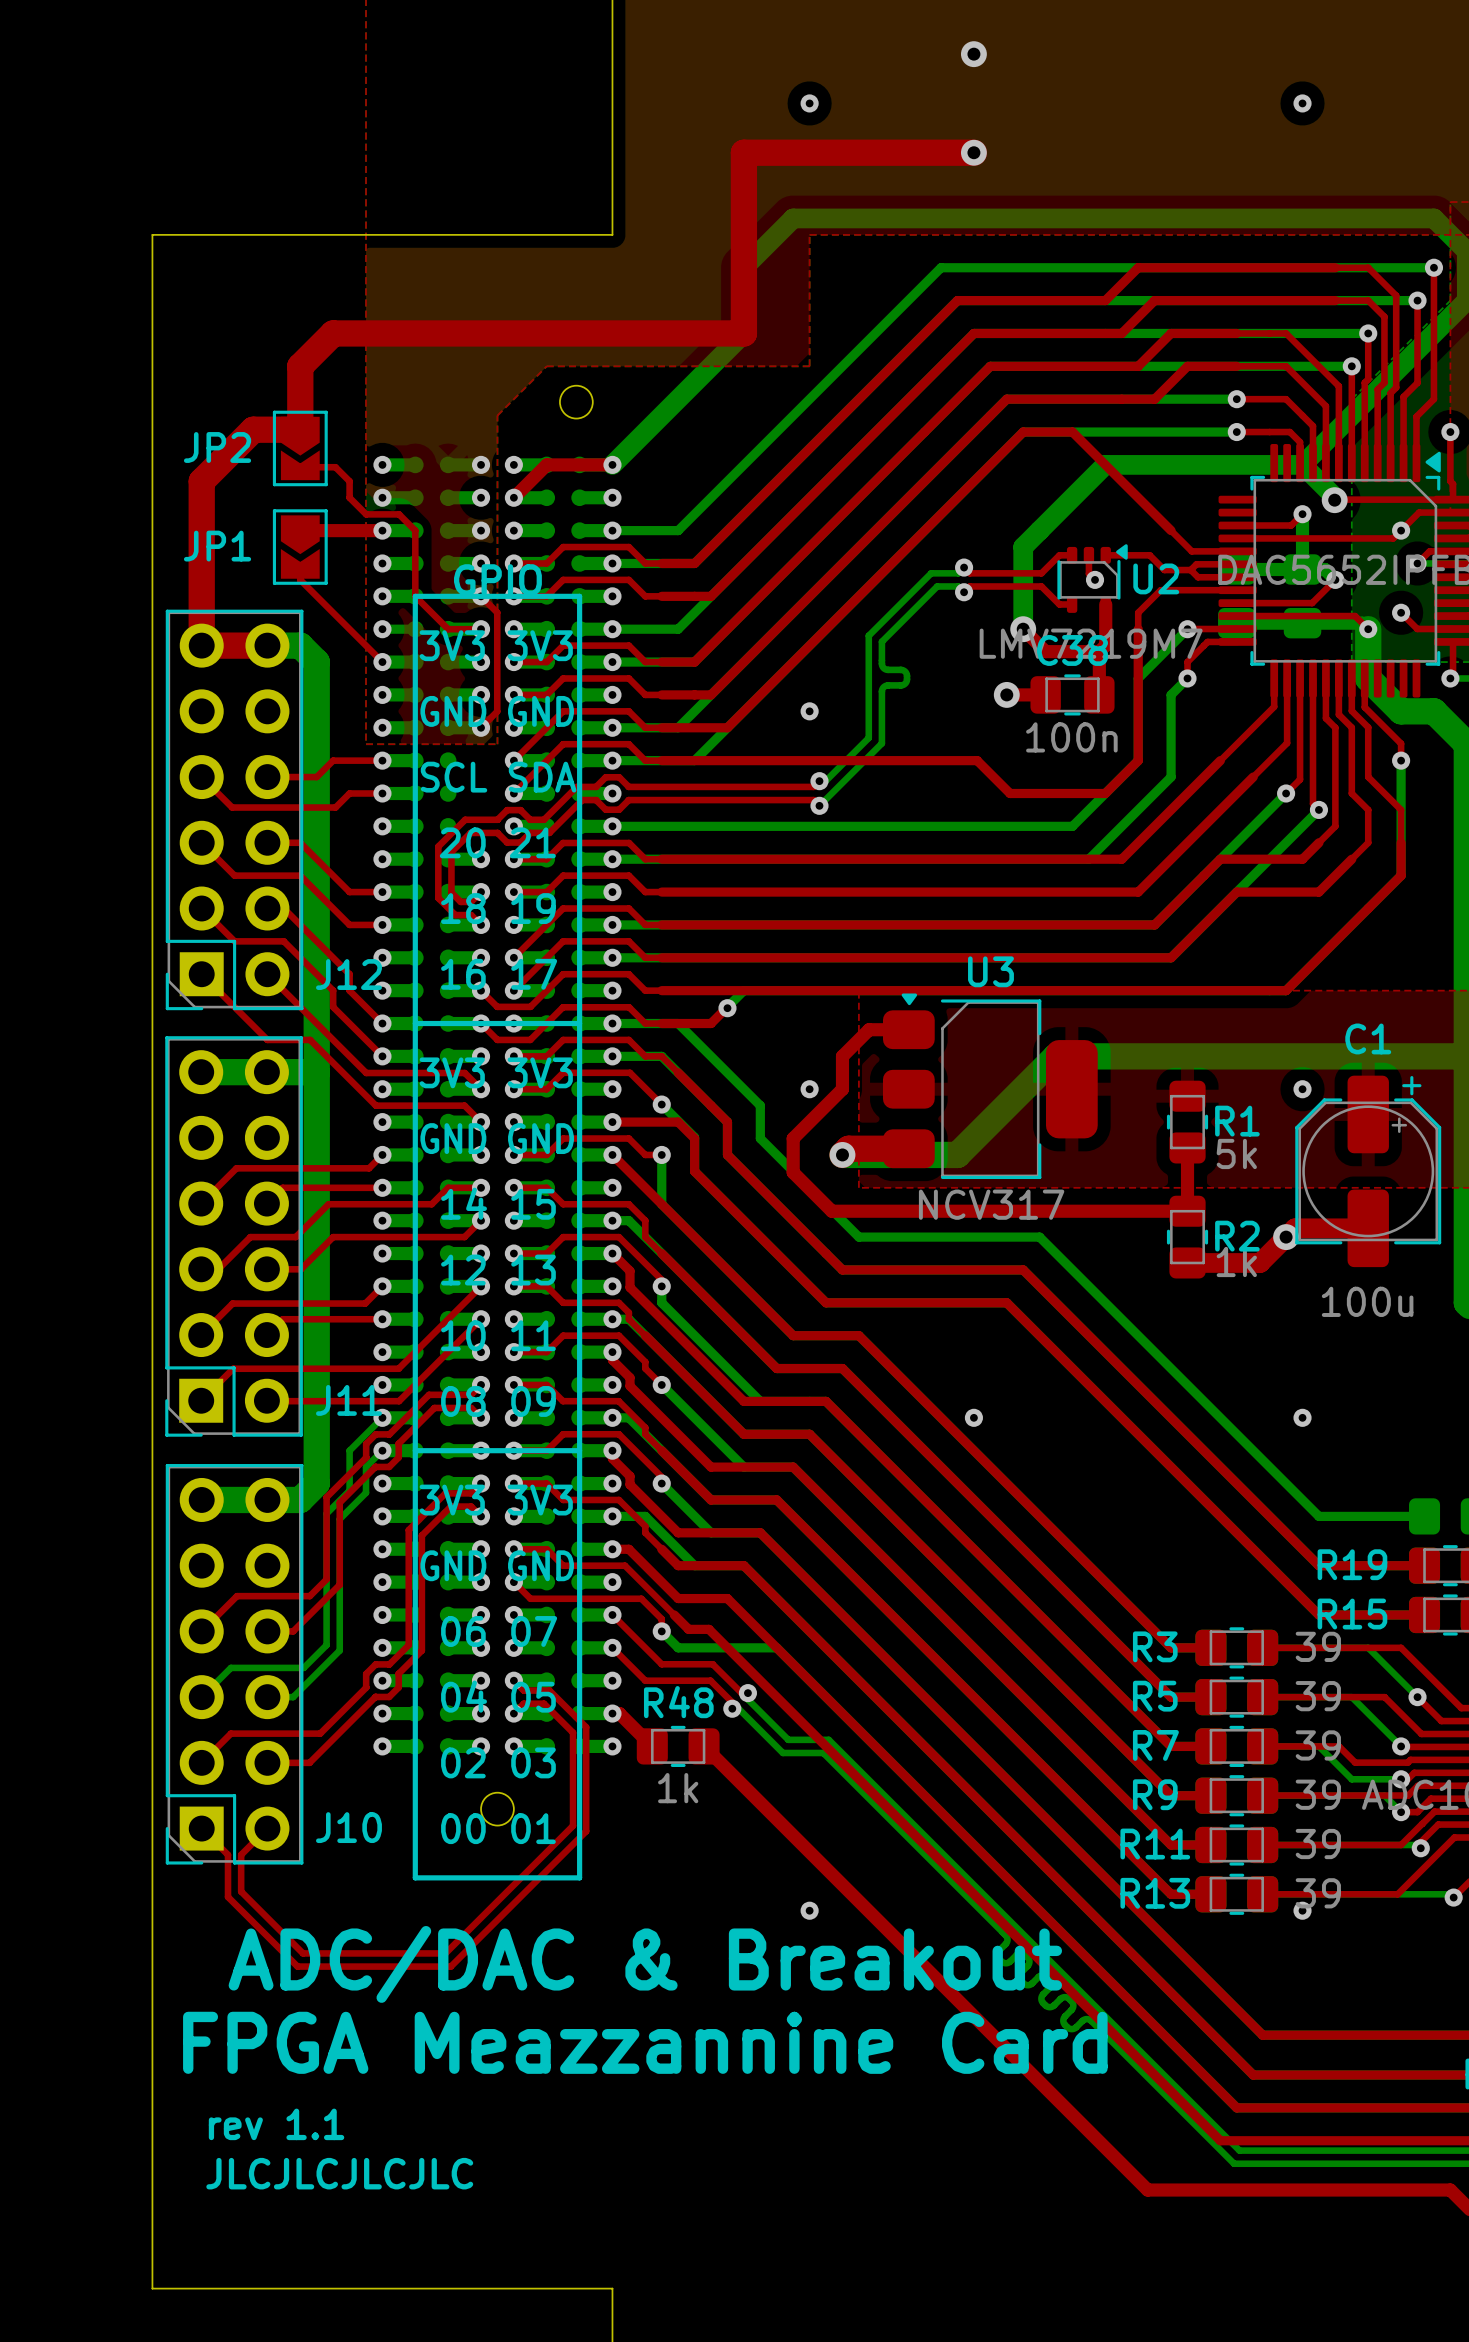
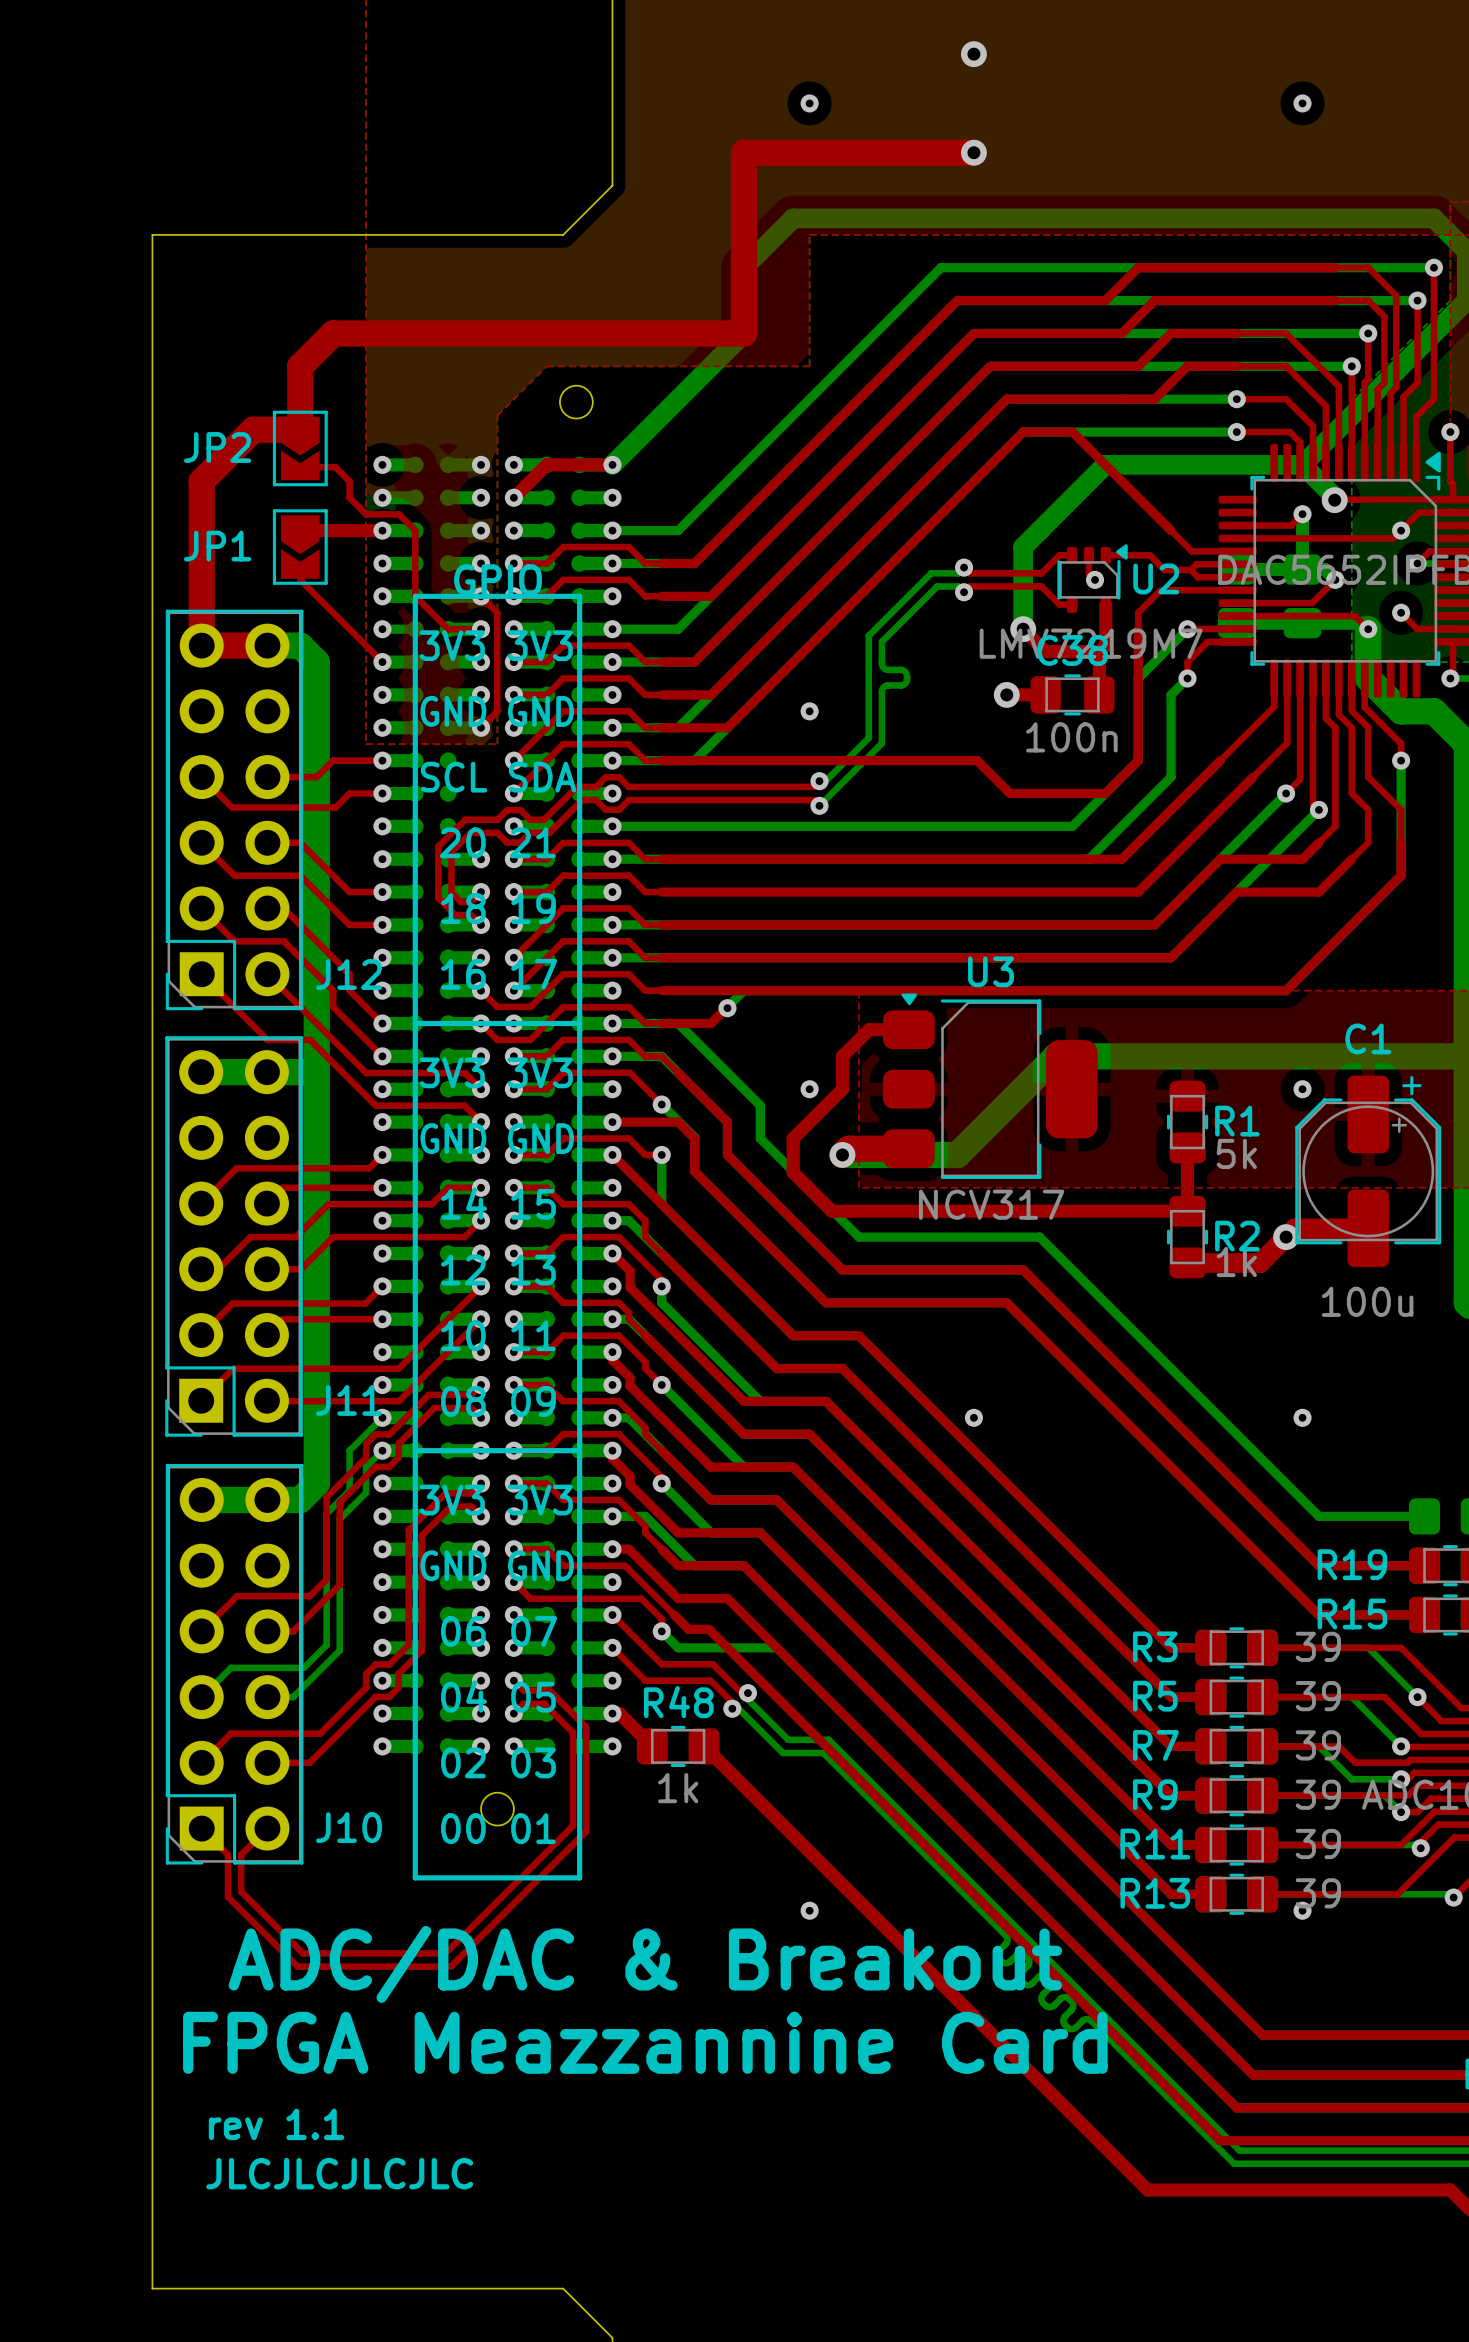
board edge: (612, 185) (612, 234) (563, 234) -> (612, 185) (563, 234)
board edge: (563, 2288) (612, 2288) (612, 2337) -> (563, 2288) (612, 2337)

